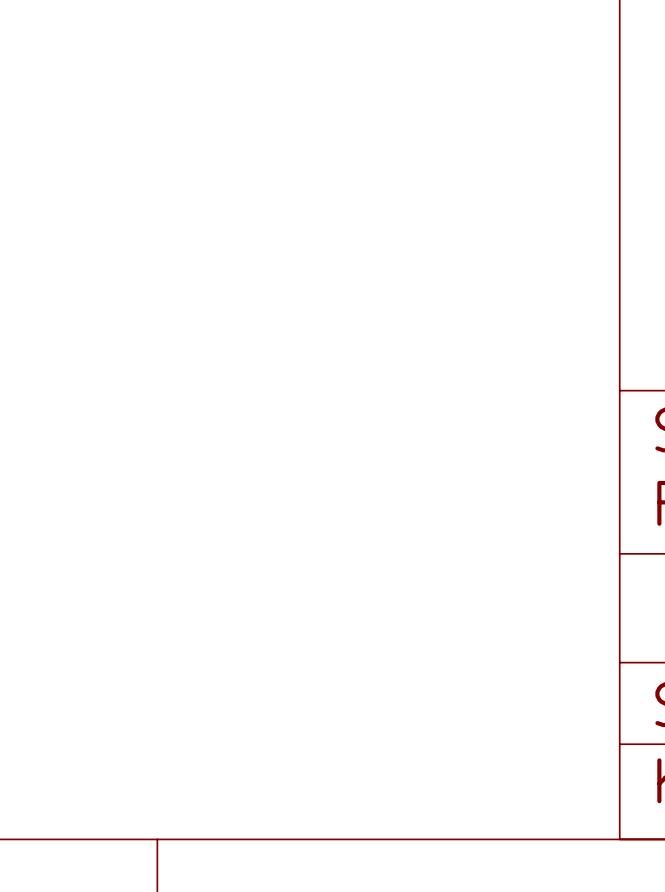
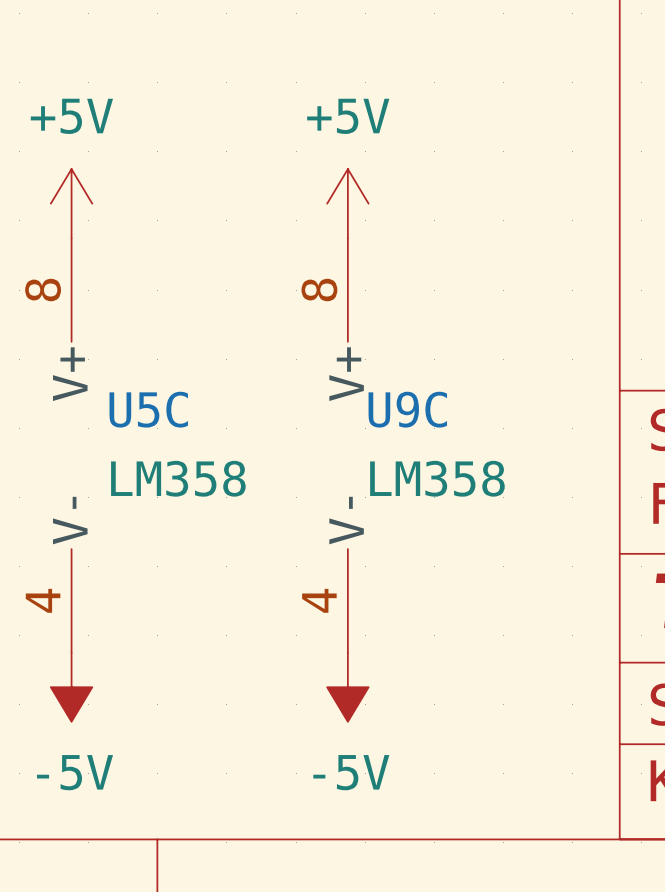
power symbol: none -> +5V (71, 203)
power symbol: none -> +5V (347, 203)
U5C: none -> LM358 (71, 445)
U9C: none -> LM358 (347, 445)
power symbol: none -> -5V (71, 687)
power symbol: none -> -5V (347, 687)

